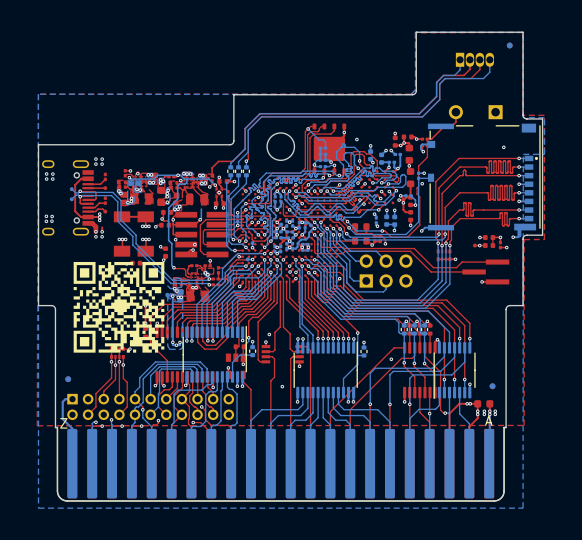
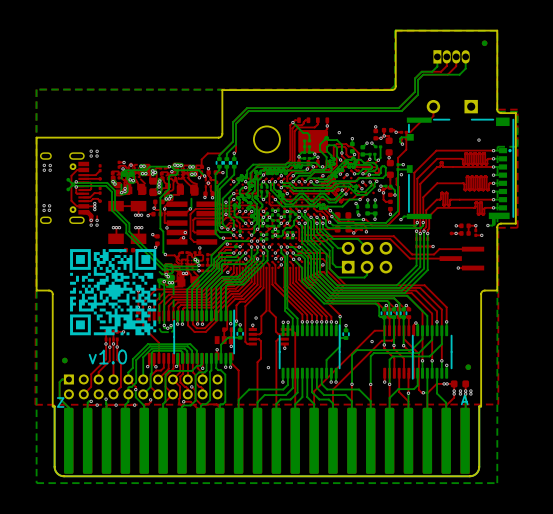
text: none -> v1.0 (107, 356)

